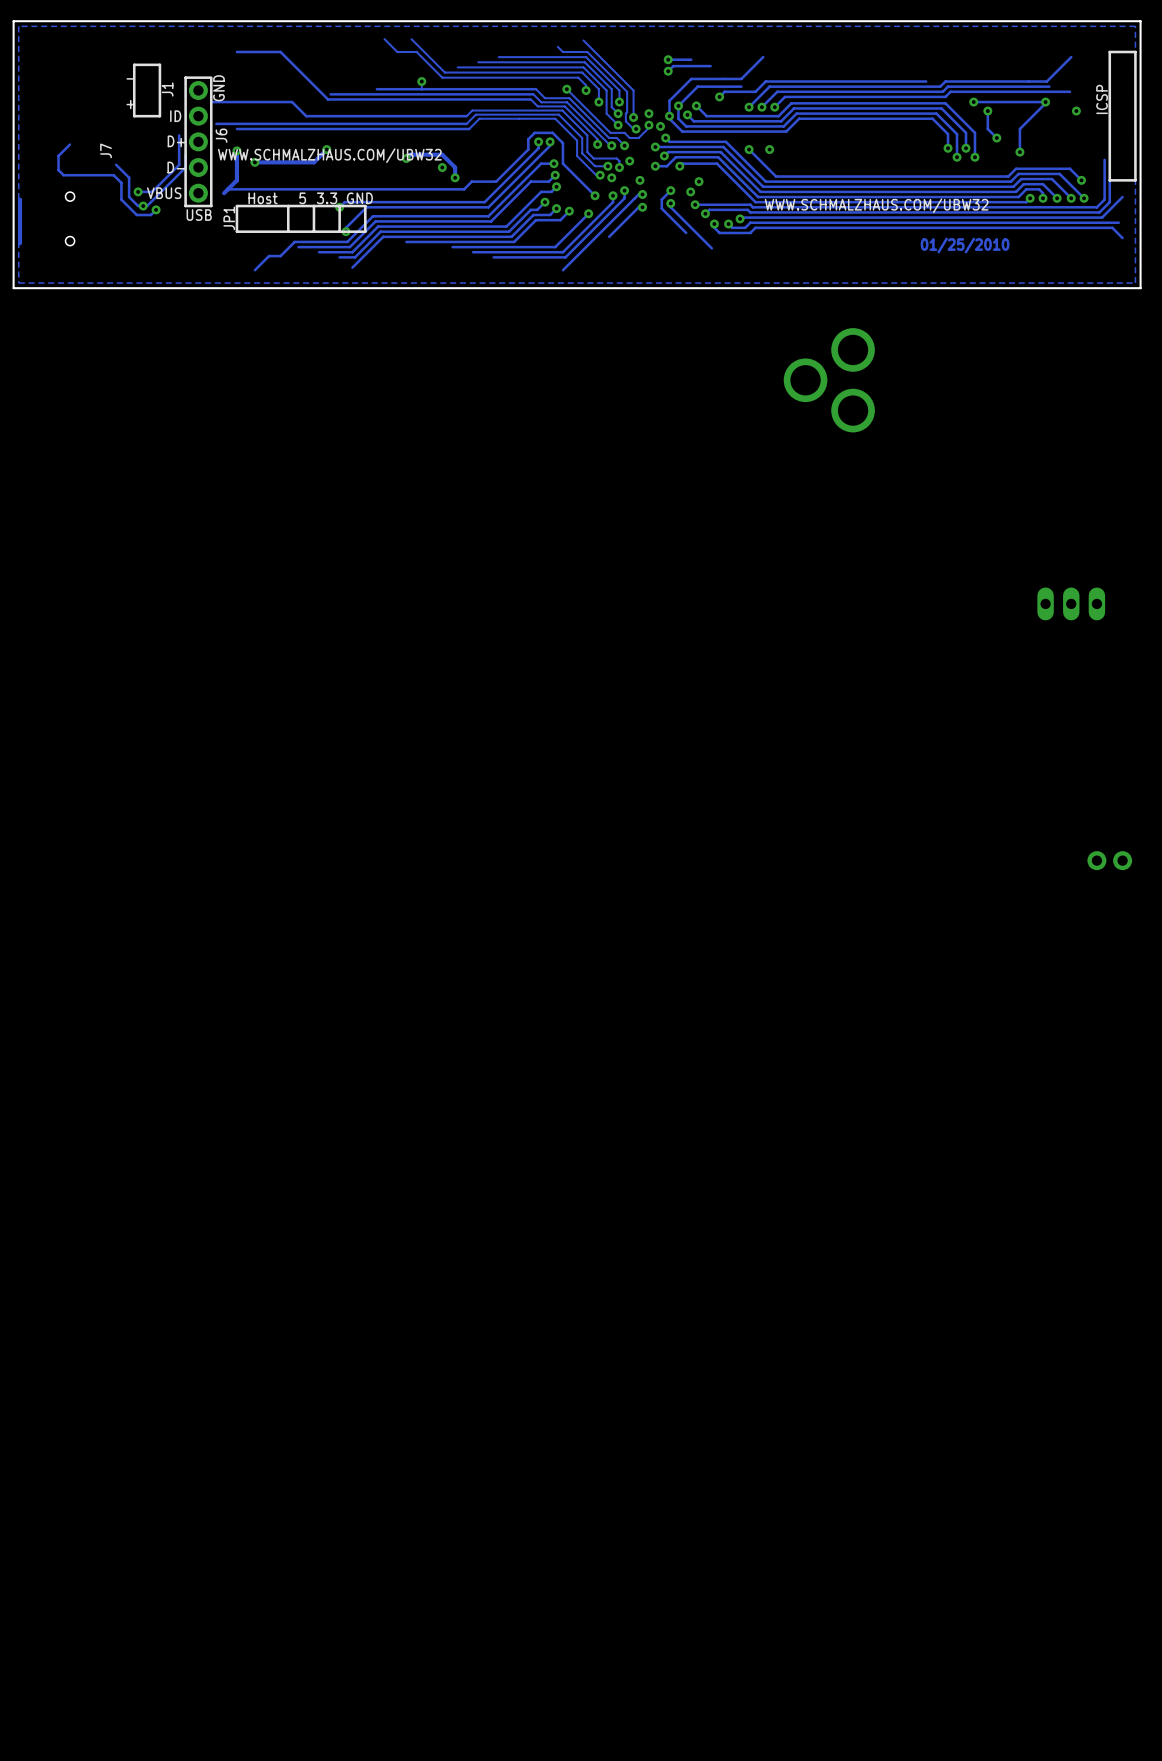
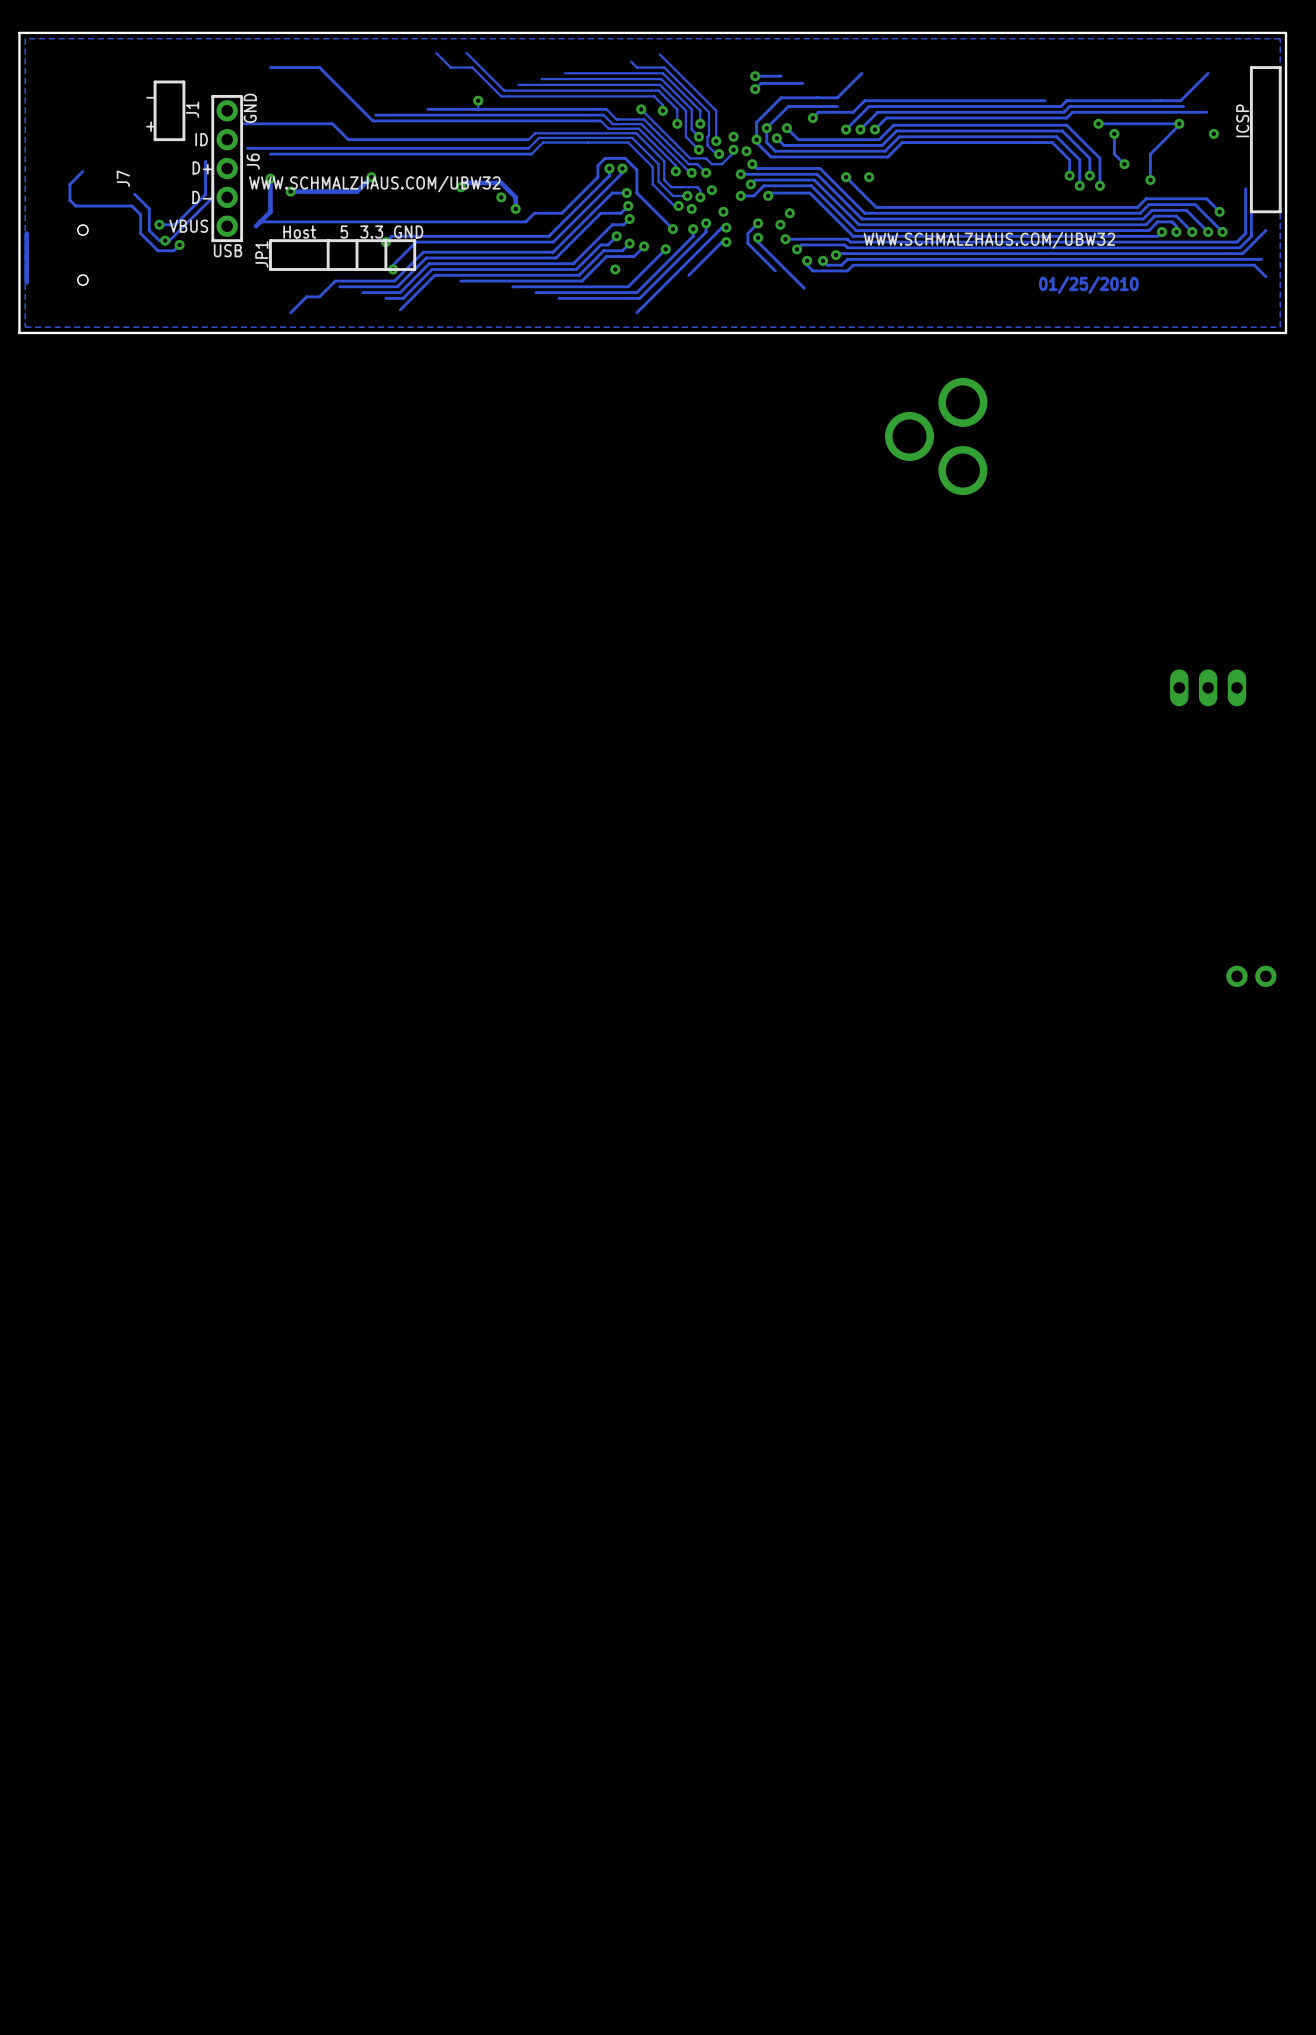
via: none -> (615, 269)

